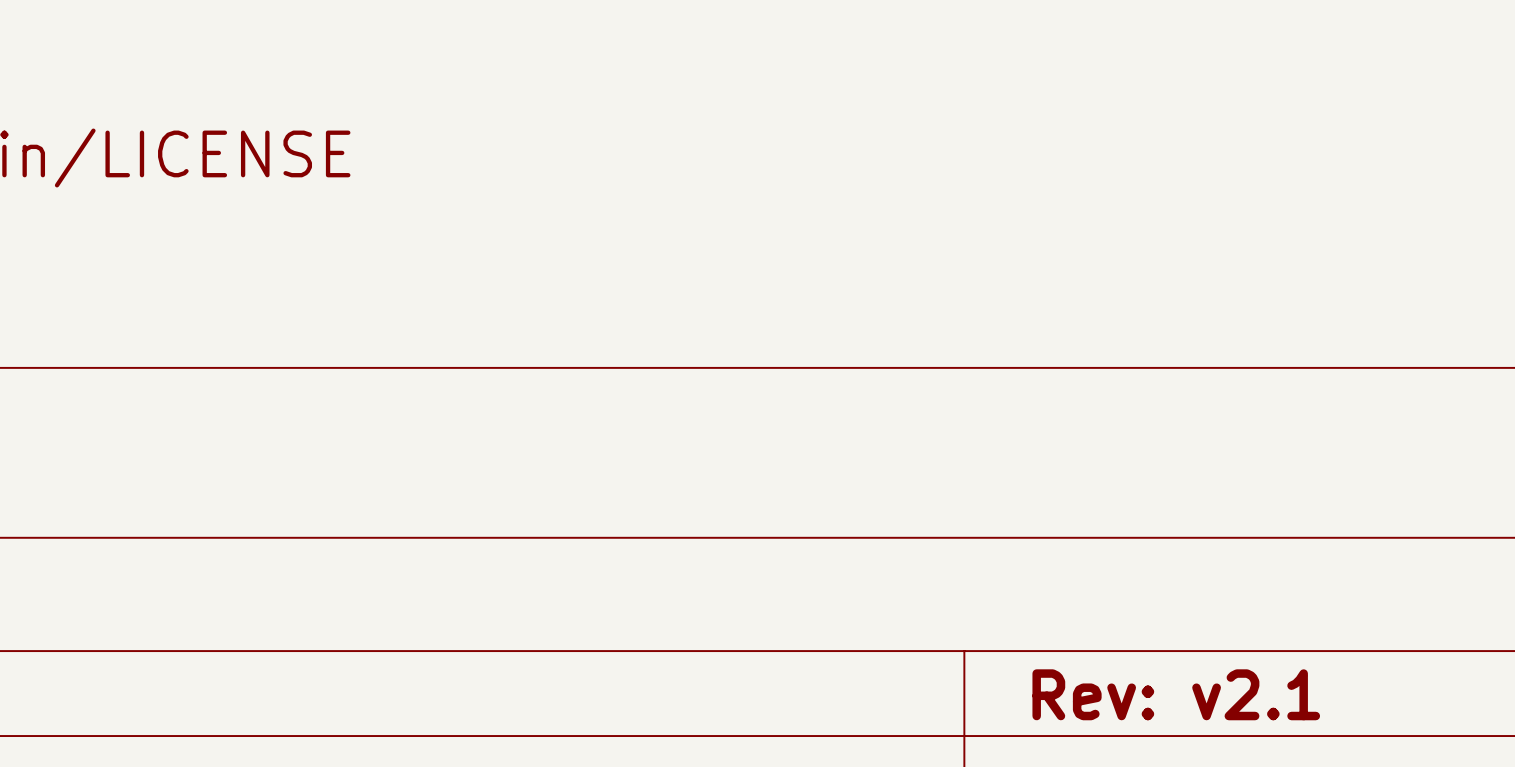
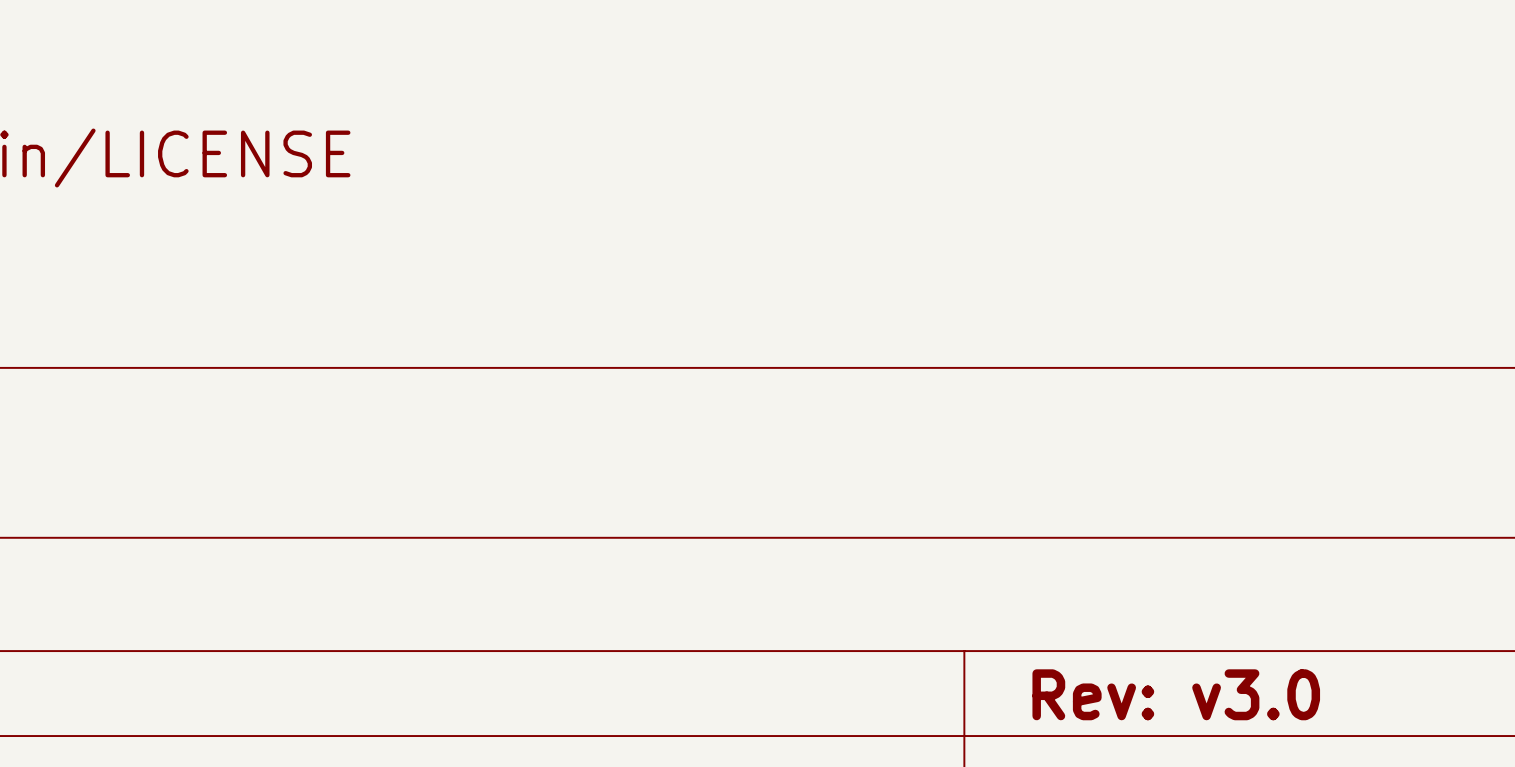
title block: Rev: v2.1 (1176, 694) -> Rev: v3.0 (1176, 694)

